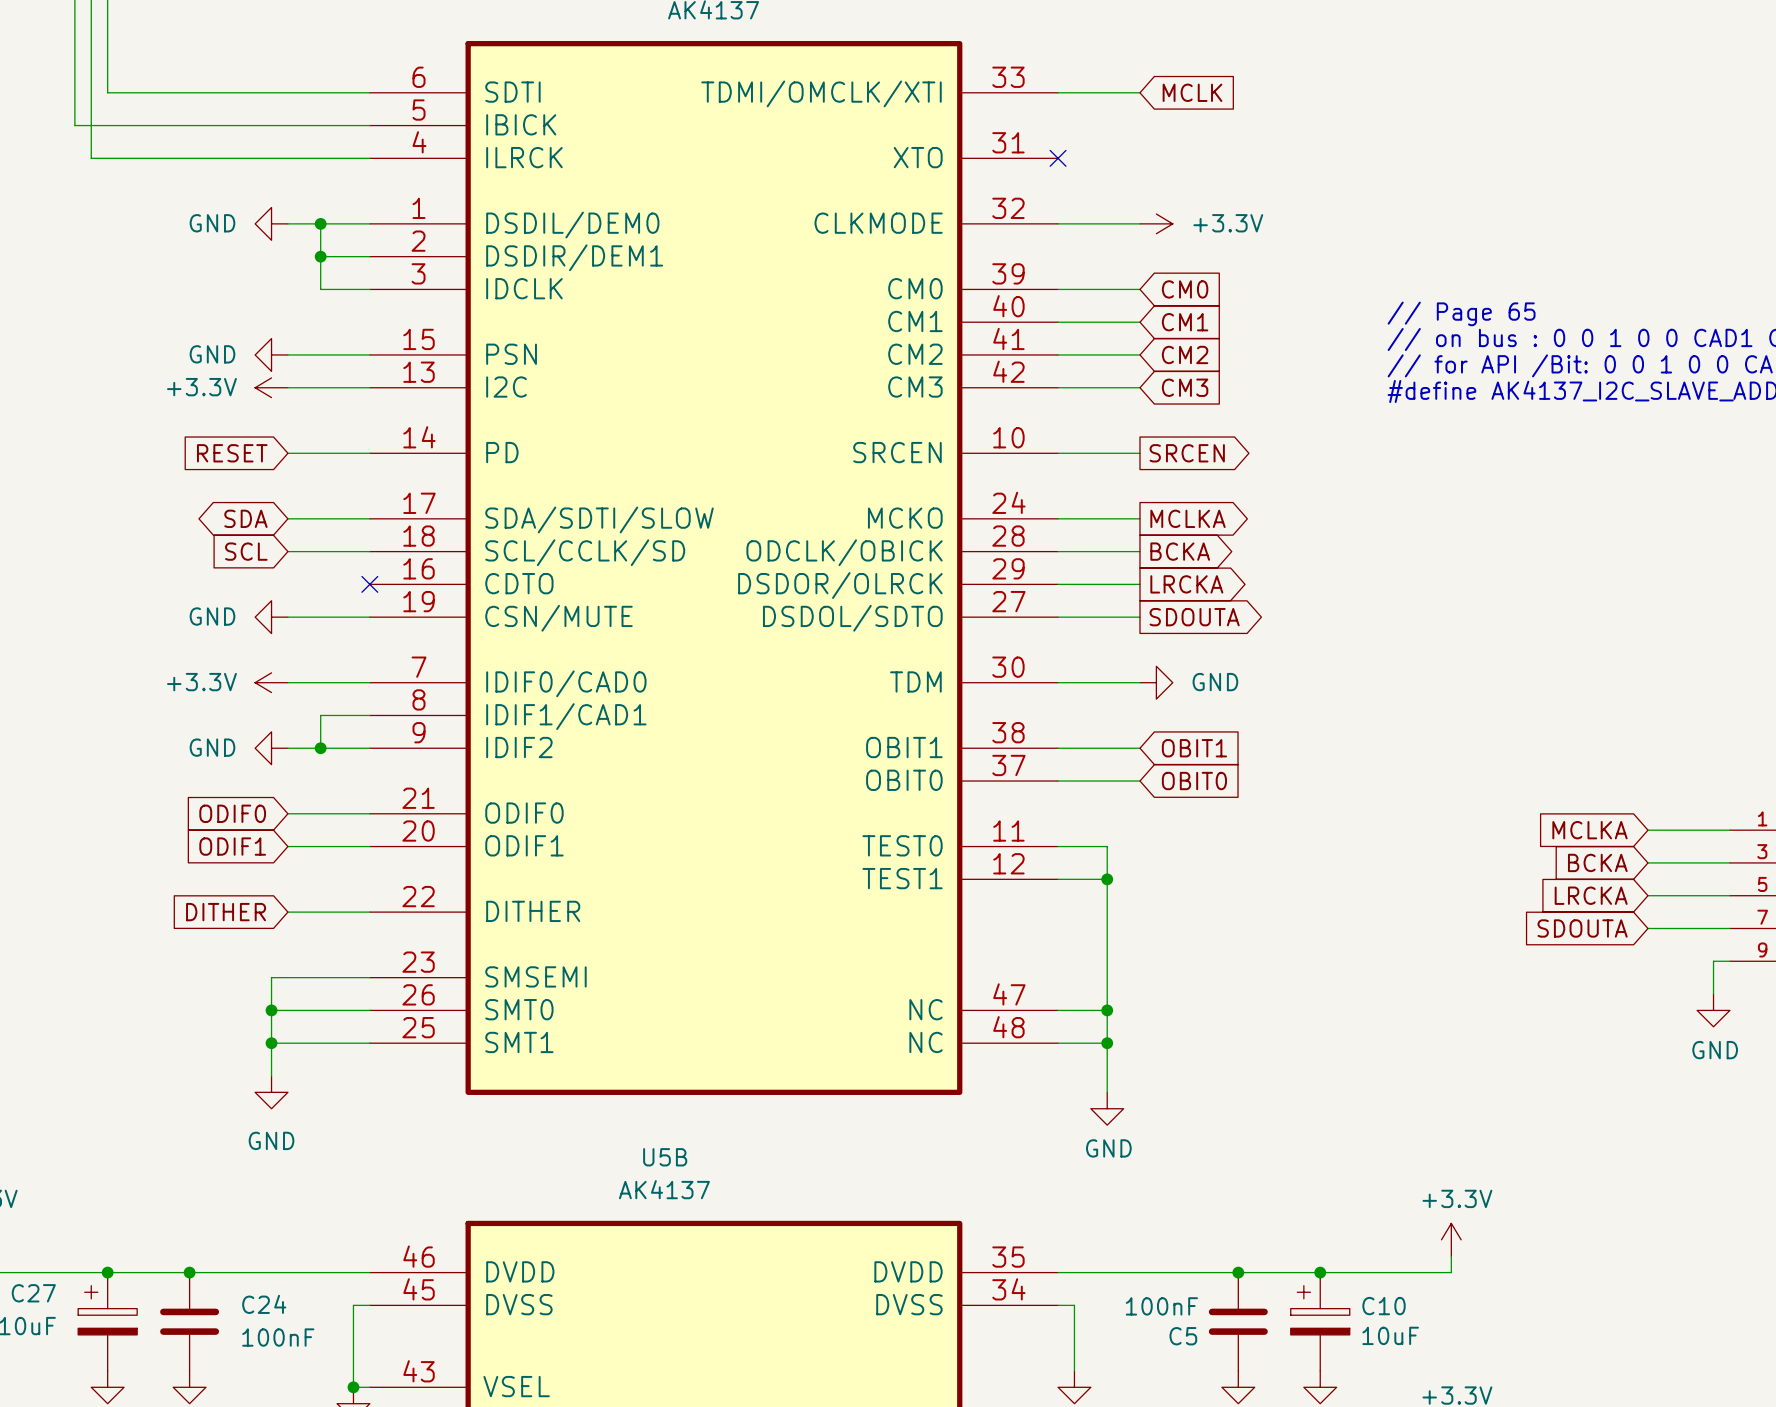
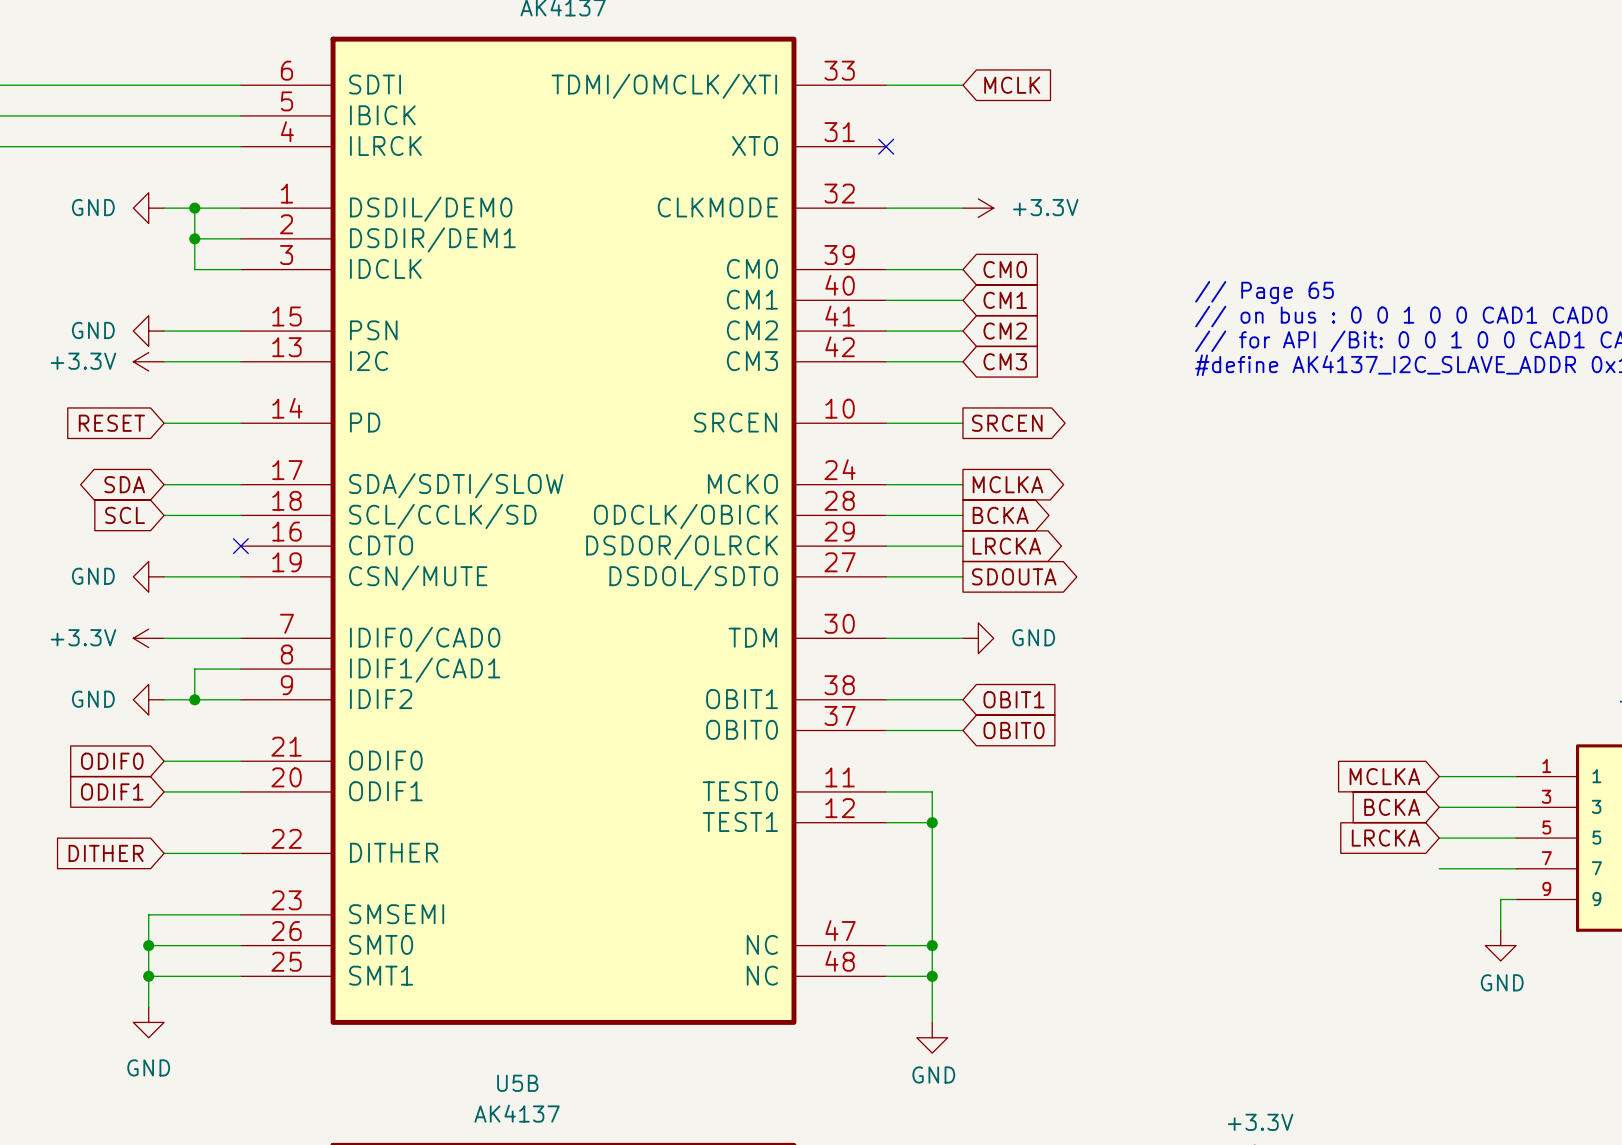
global label: SDOUTA (1582, 928) -> none

